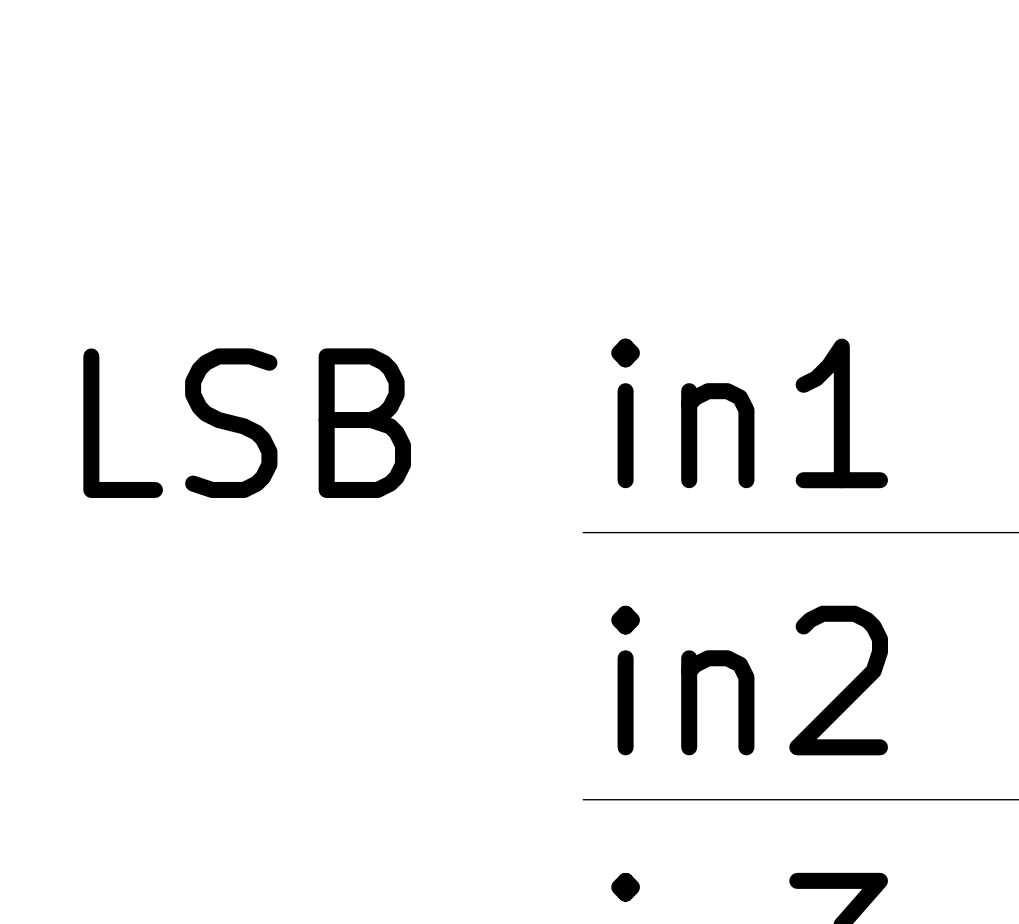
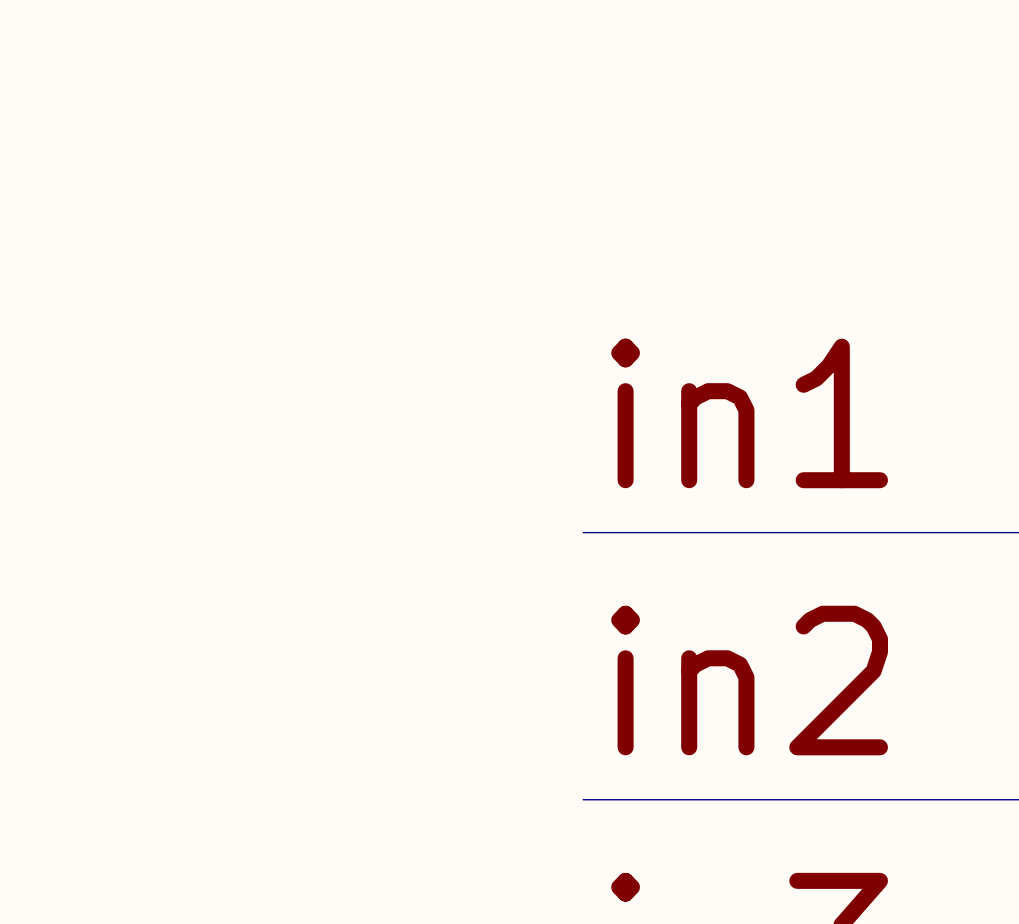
text: LSB (247, 423) -> none

